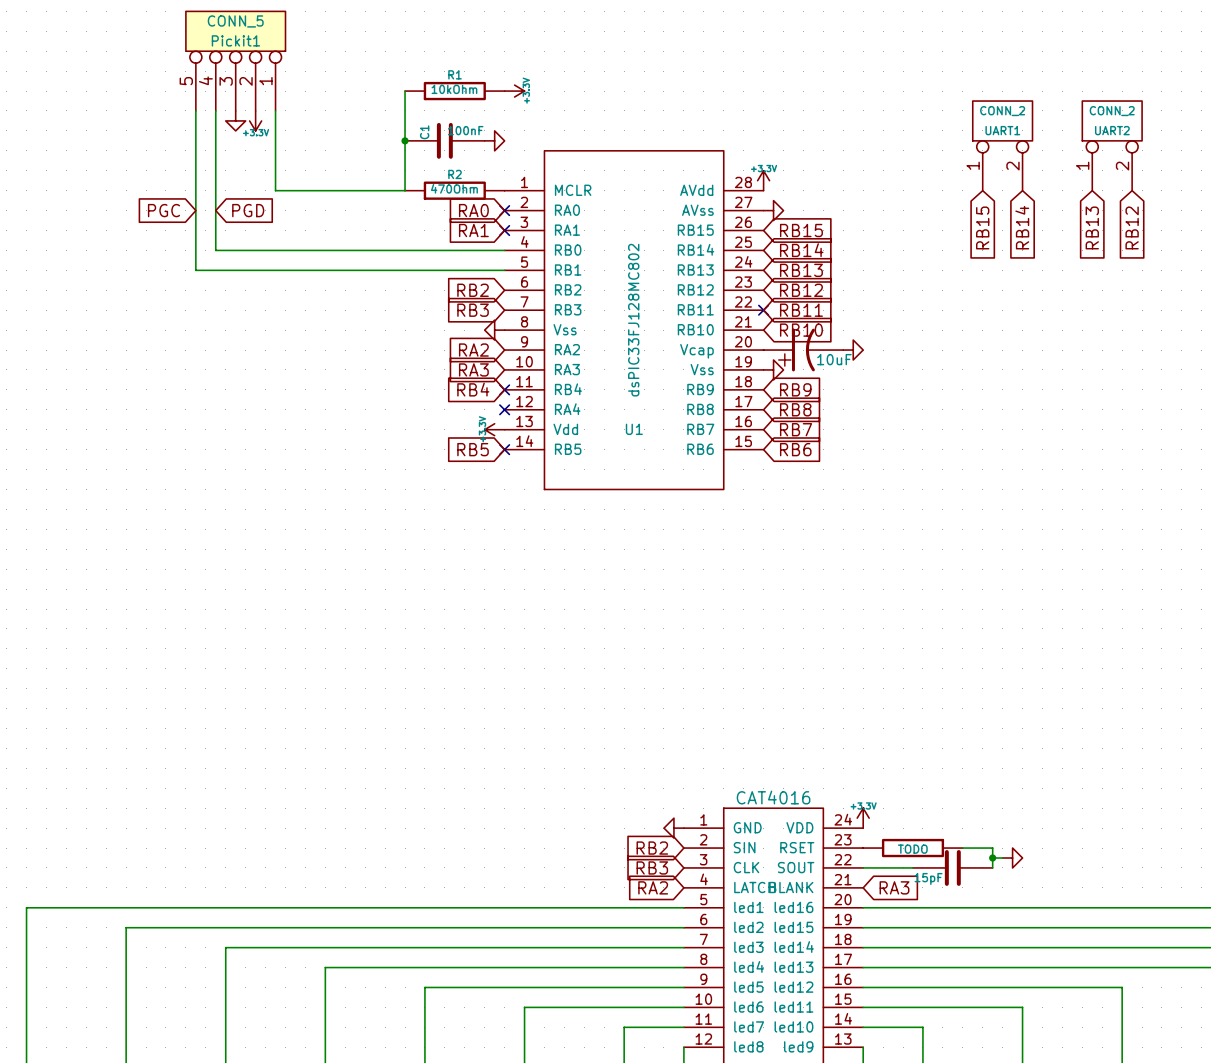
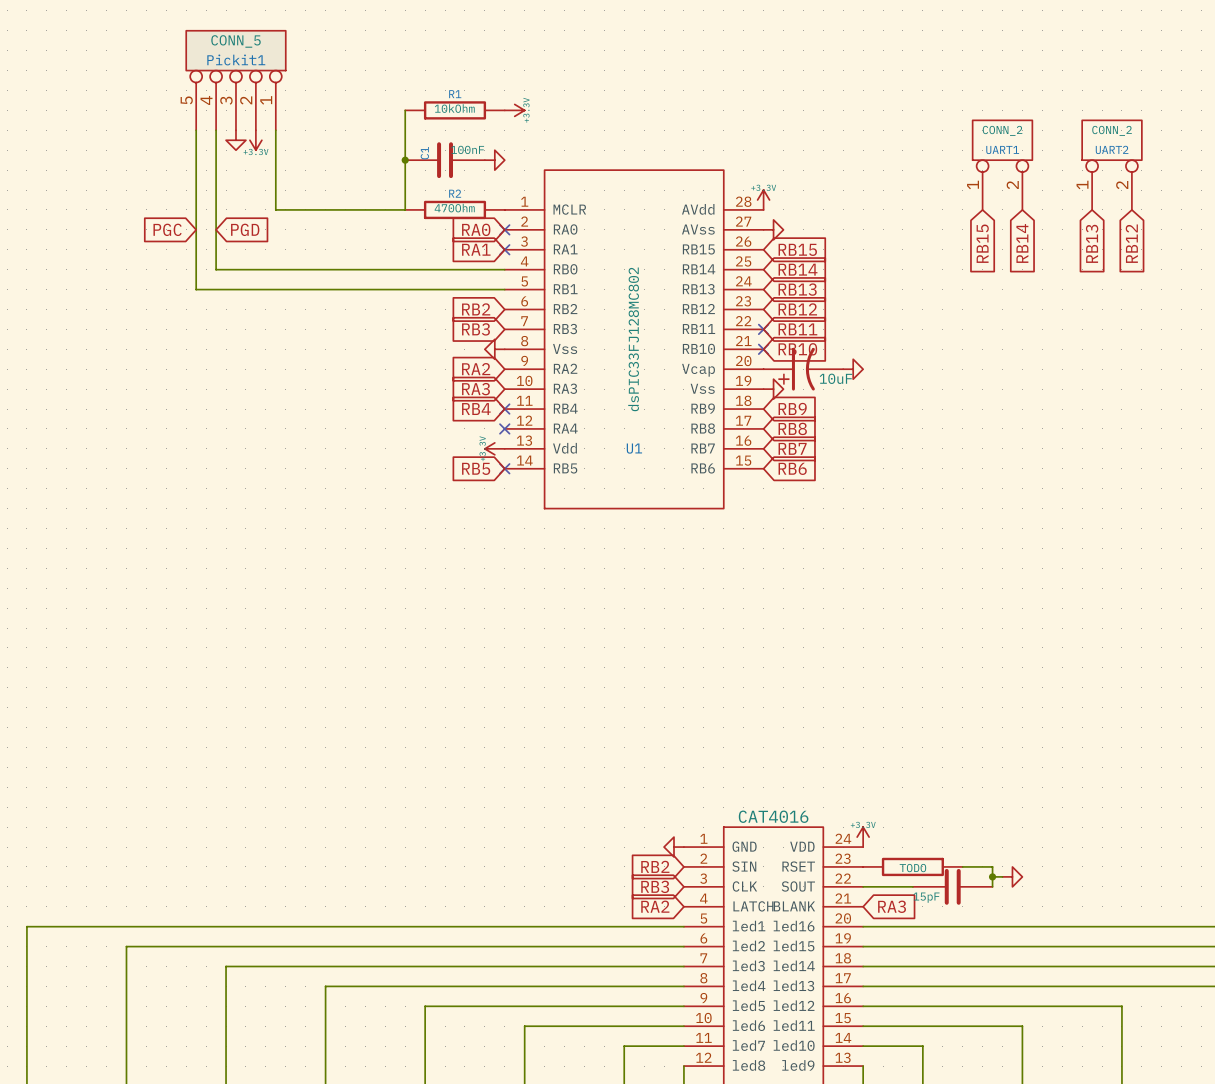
no-connect mark: none -> (763, 349)

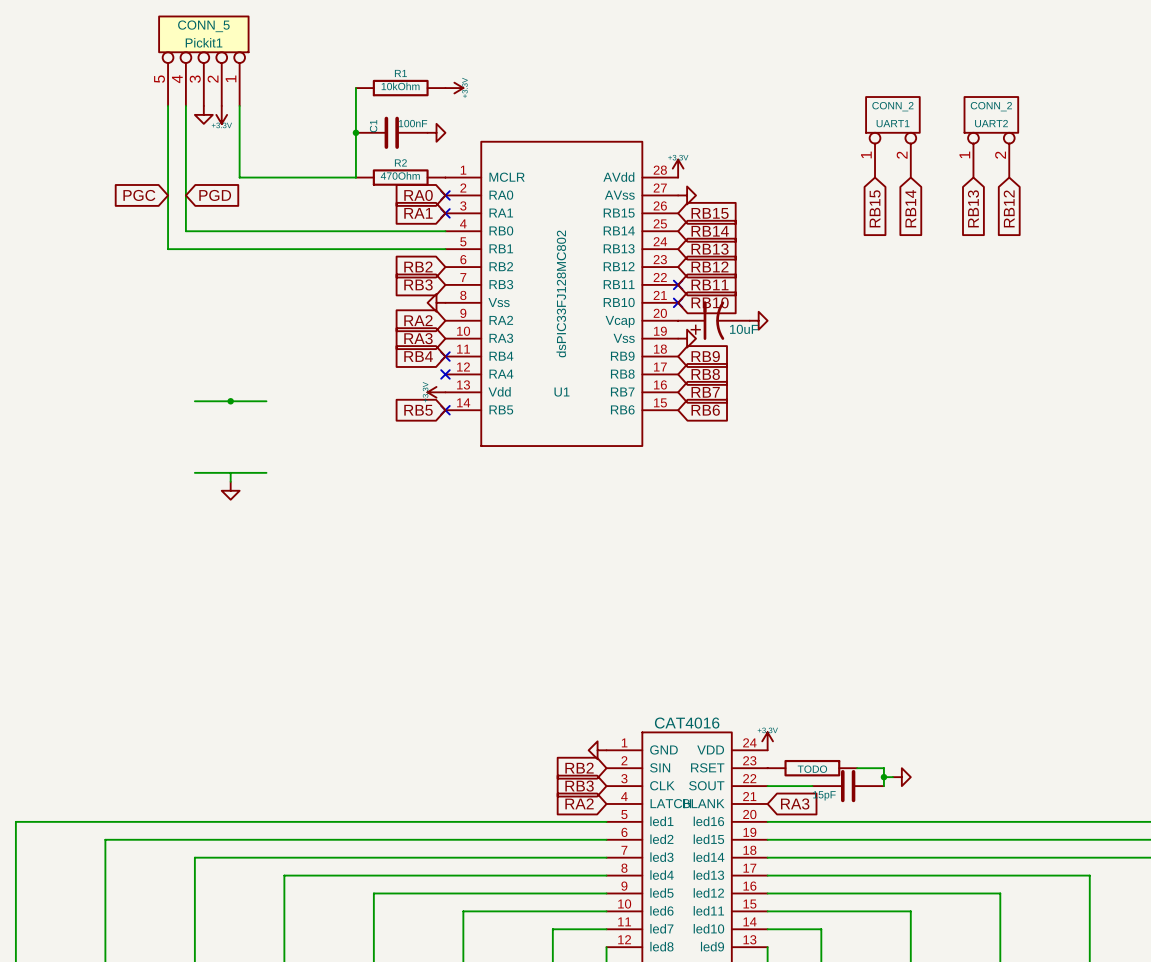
wire: none -> (194, 401) (266, 401)
junction: none -> (230, 401)
wire: none -> (194, 472) (266, 472)
wire: none -> (230, 472) (230, 481)
power symbol: none -> (230, 490)

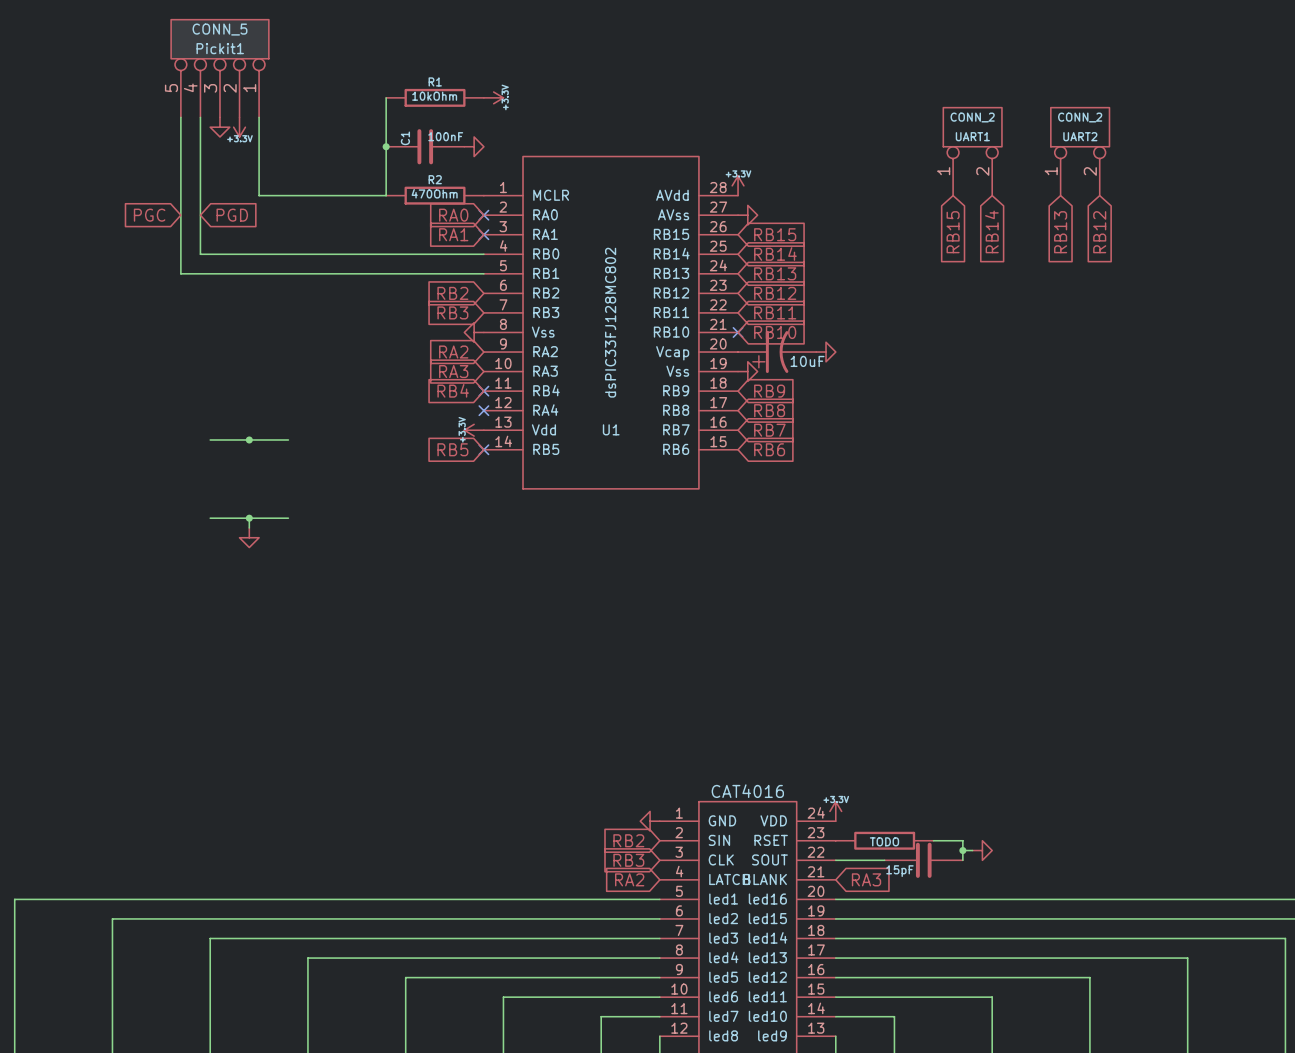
no-connect mark: (678, 284) -> none
junction: none -> (249, 518)

